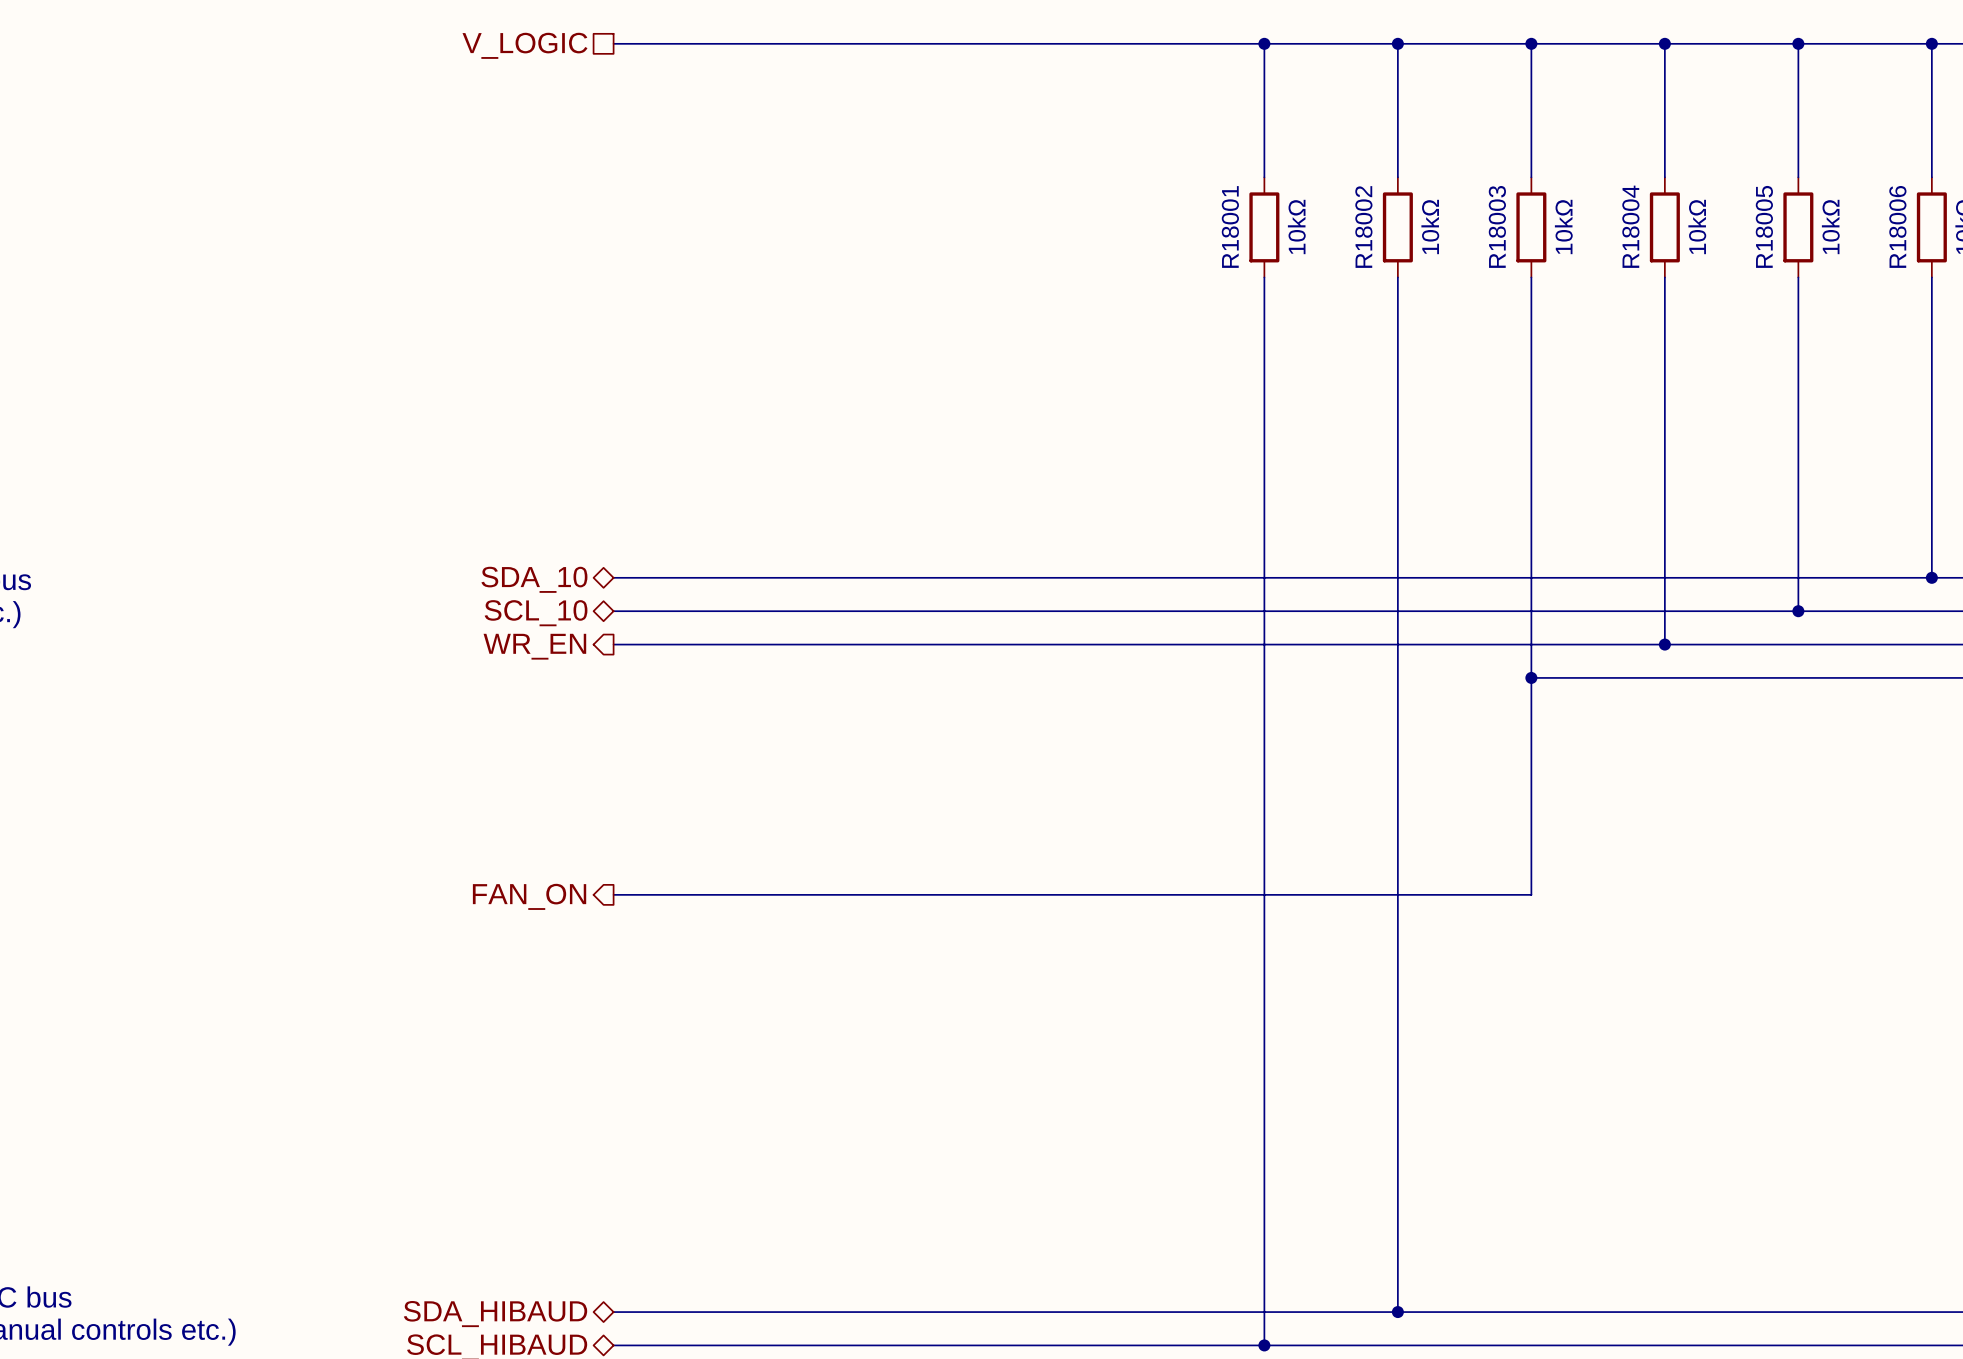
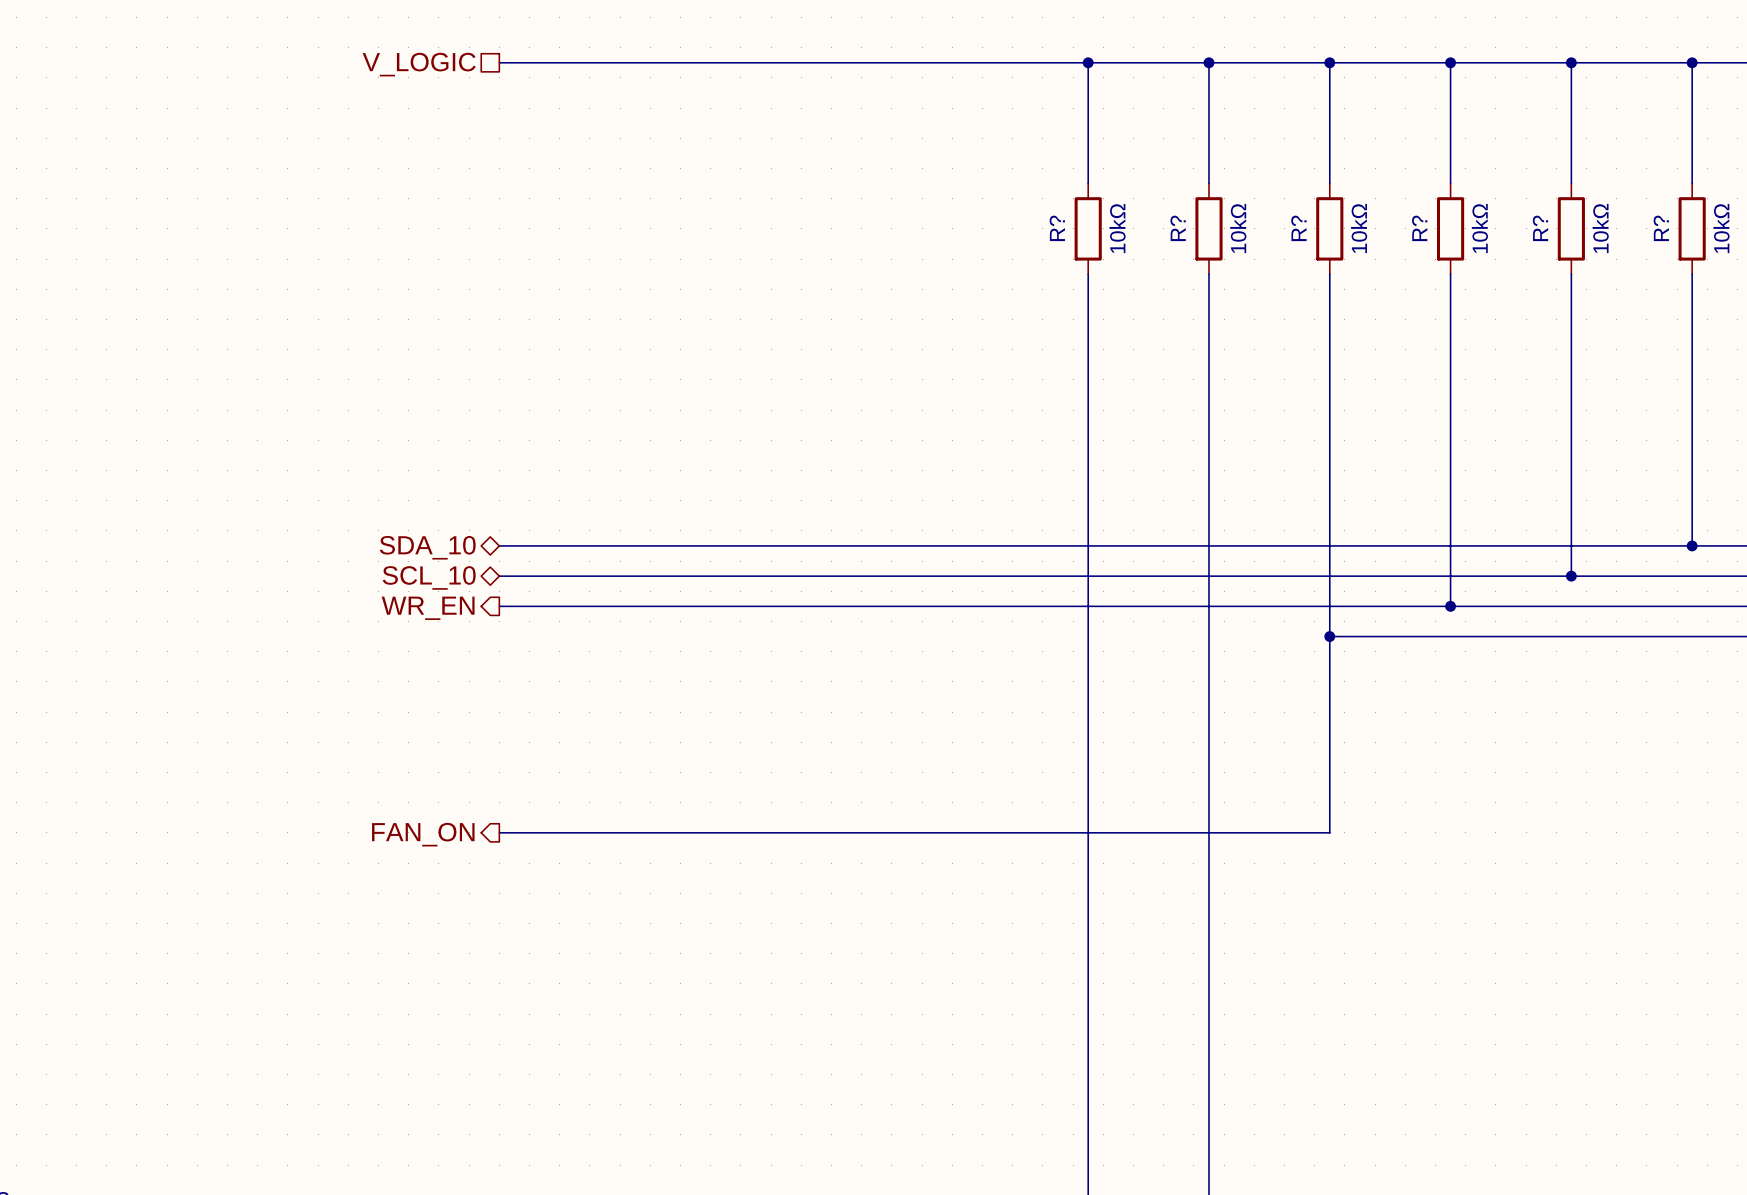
R18001 name: R18001 (1230, 226) -> R? (1057, 228)
R18003 name: R18003 (1497, 226) -> R? (1298, 228)
R18004 name: R18004 (1630, 226) -> R? (1419, 228)
R18005 name: R18005 (1764, 226) -> R? (1540, 228)
R18006 name: R18006 (1897, 226) -> R? (1661, 228)
R18002 name: R18002 (1363, 227) -> R? (1178, 228)

